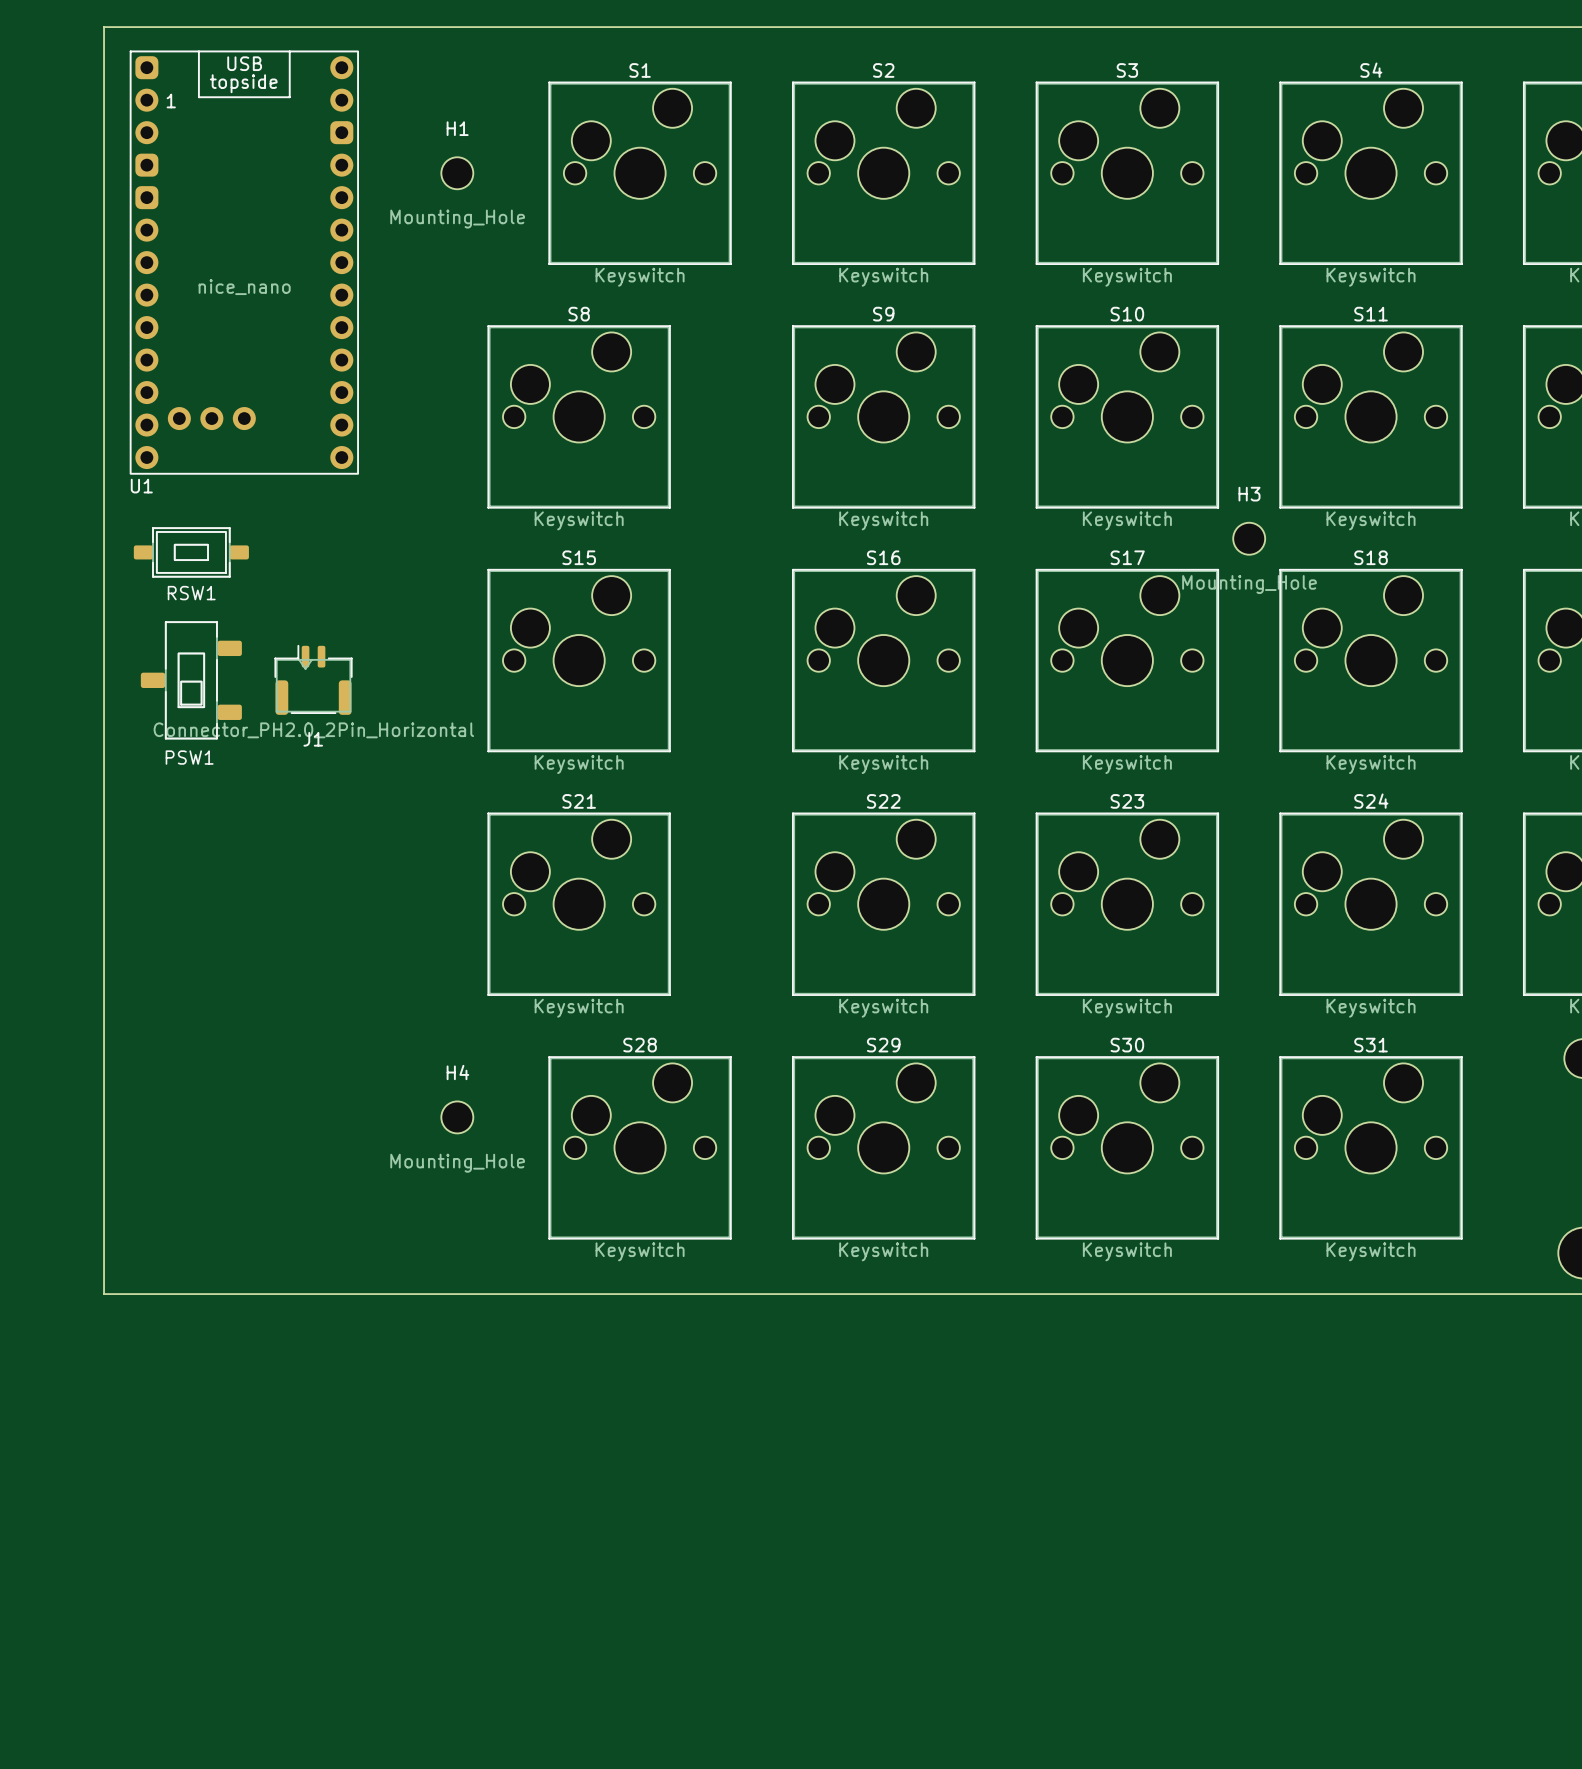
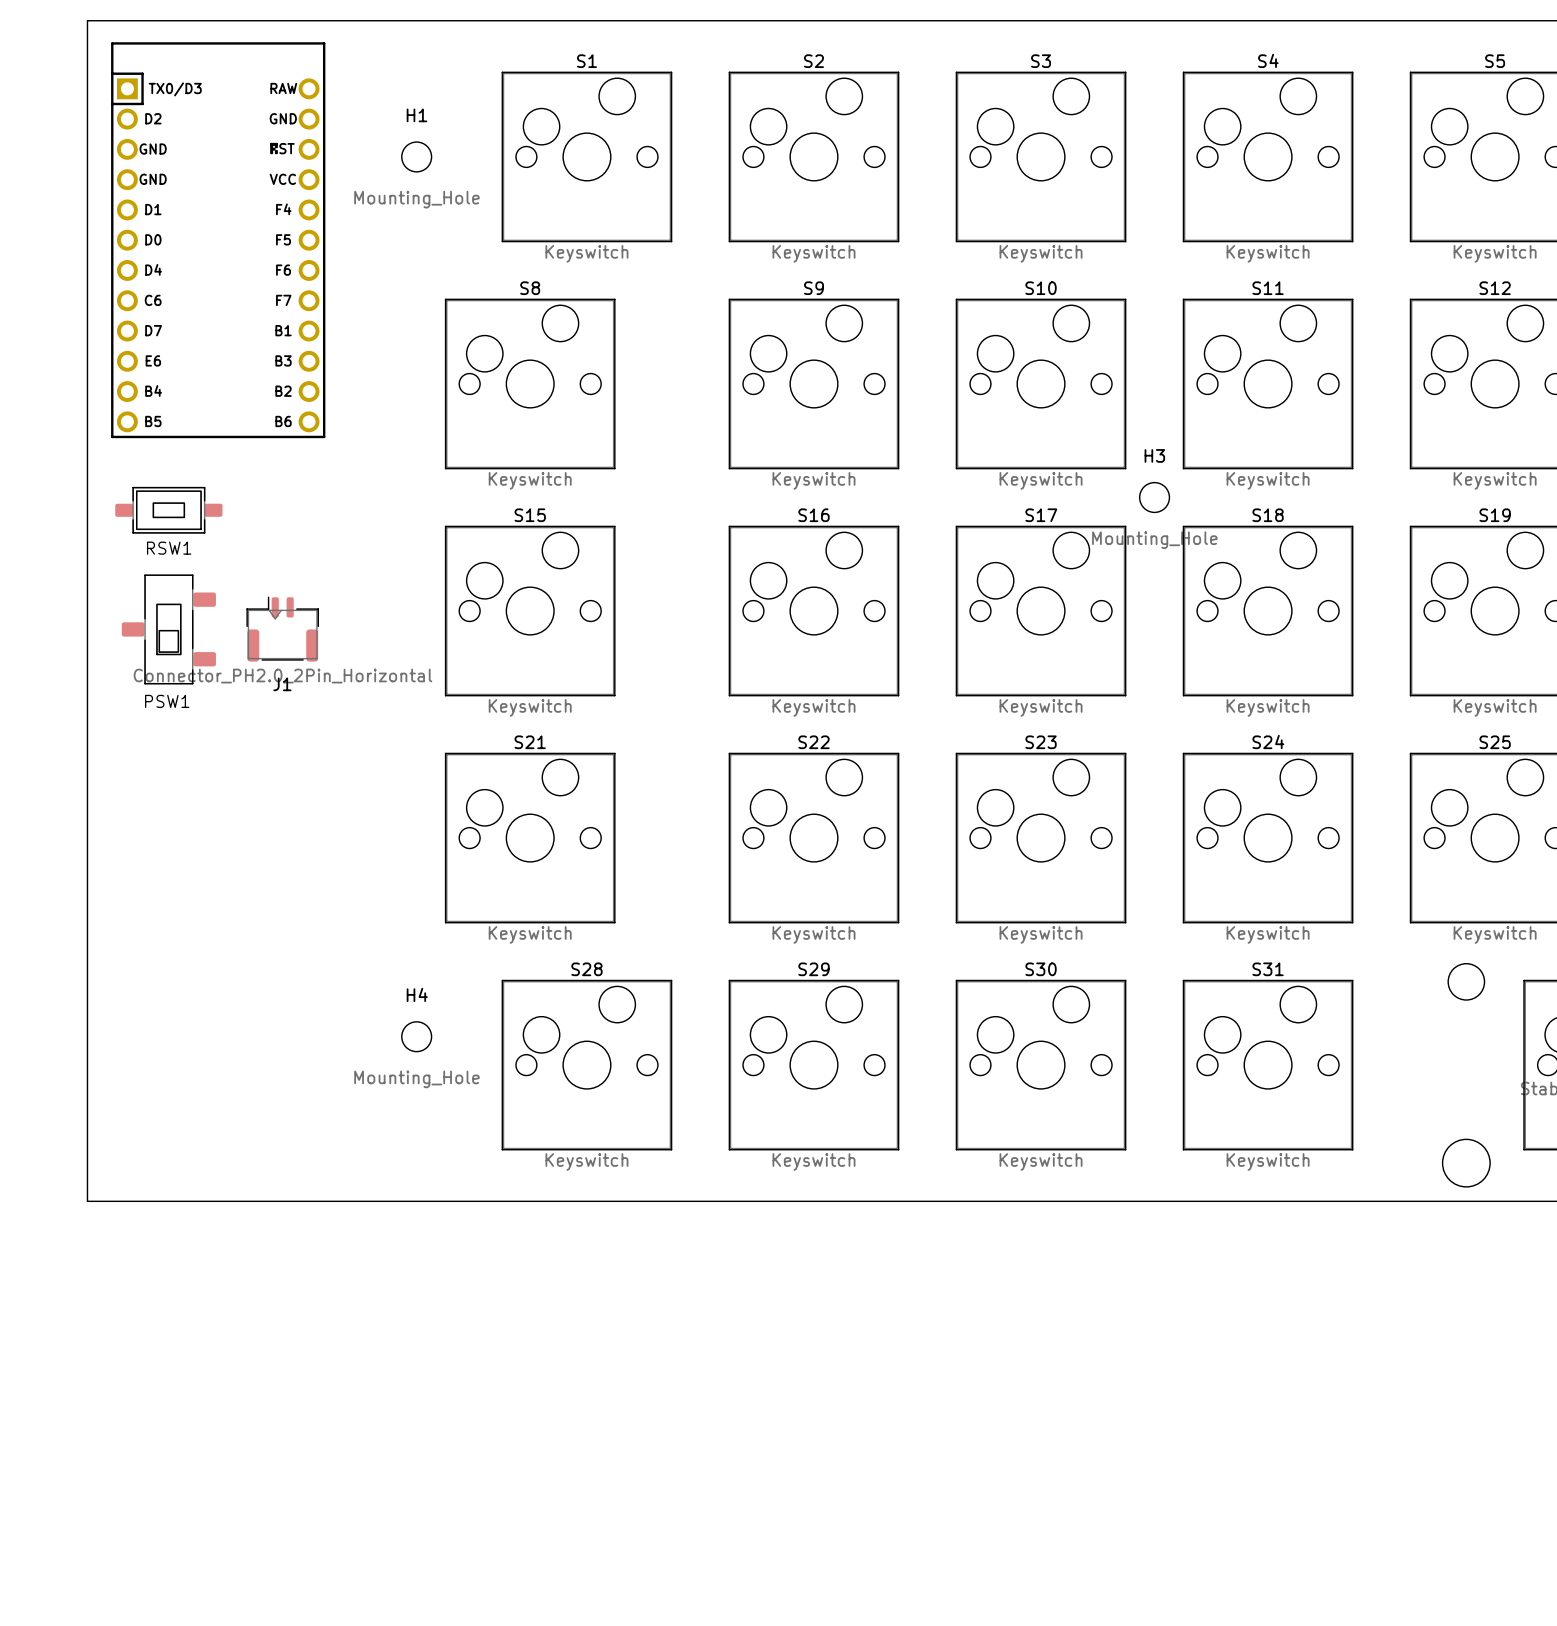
U1: nice_nano (244, 262) -> none
part: none -> (218, 240)

